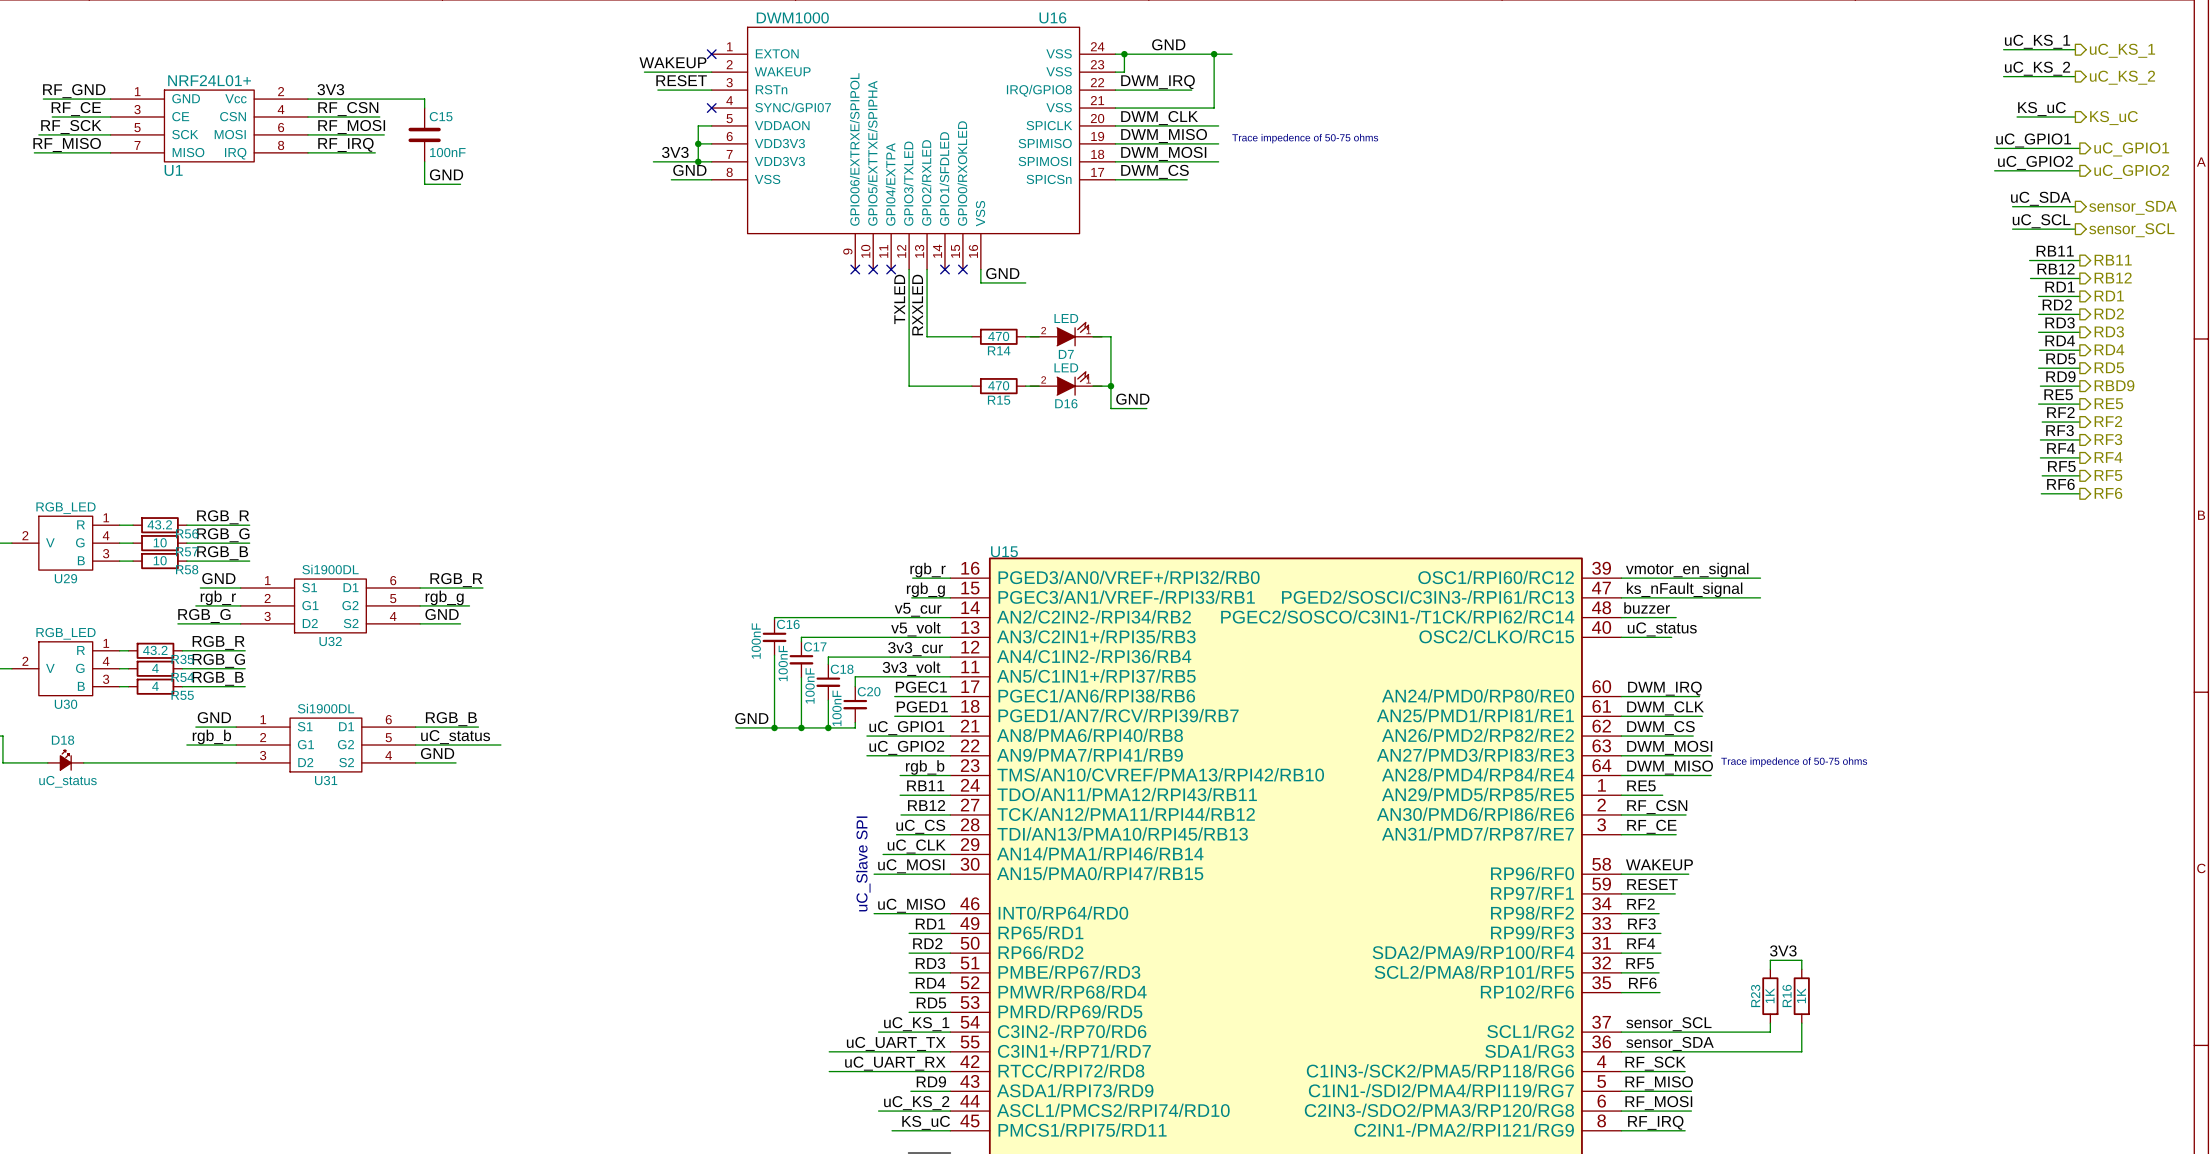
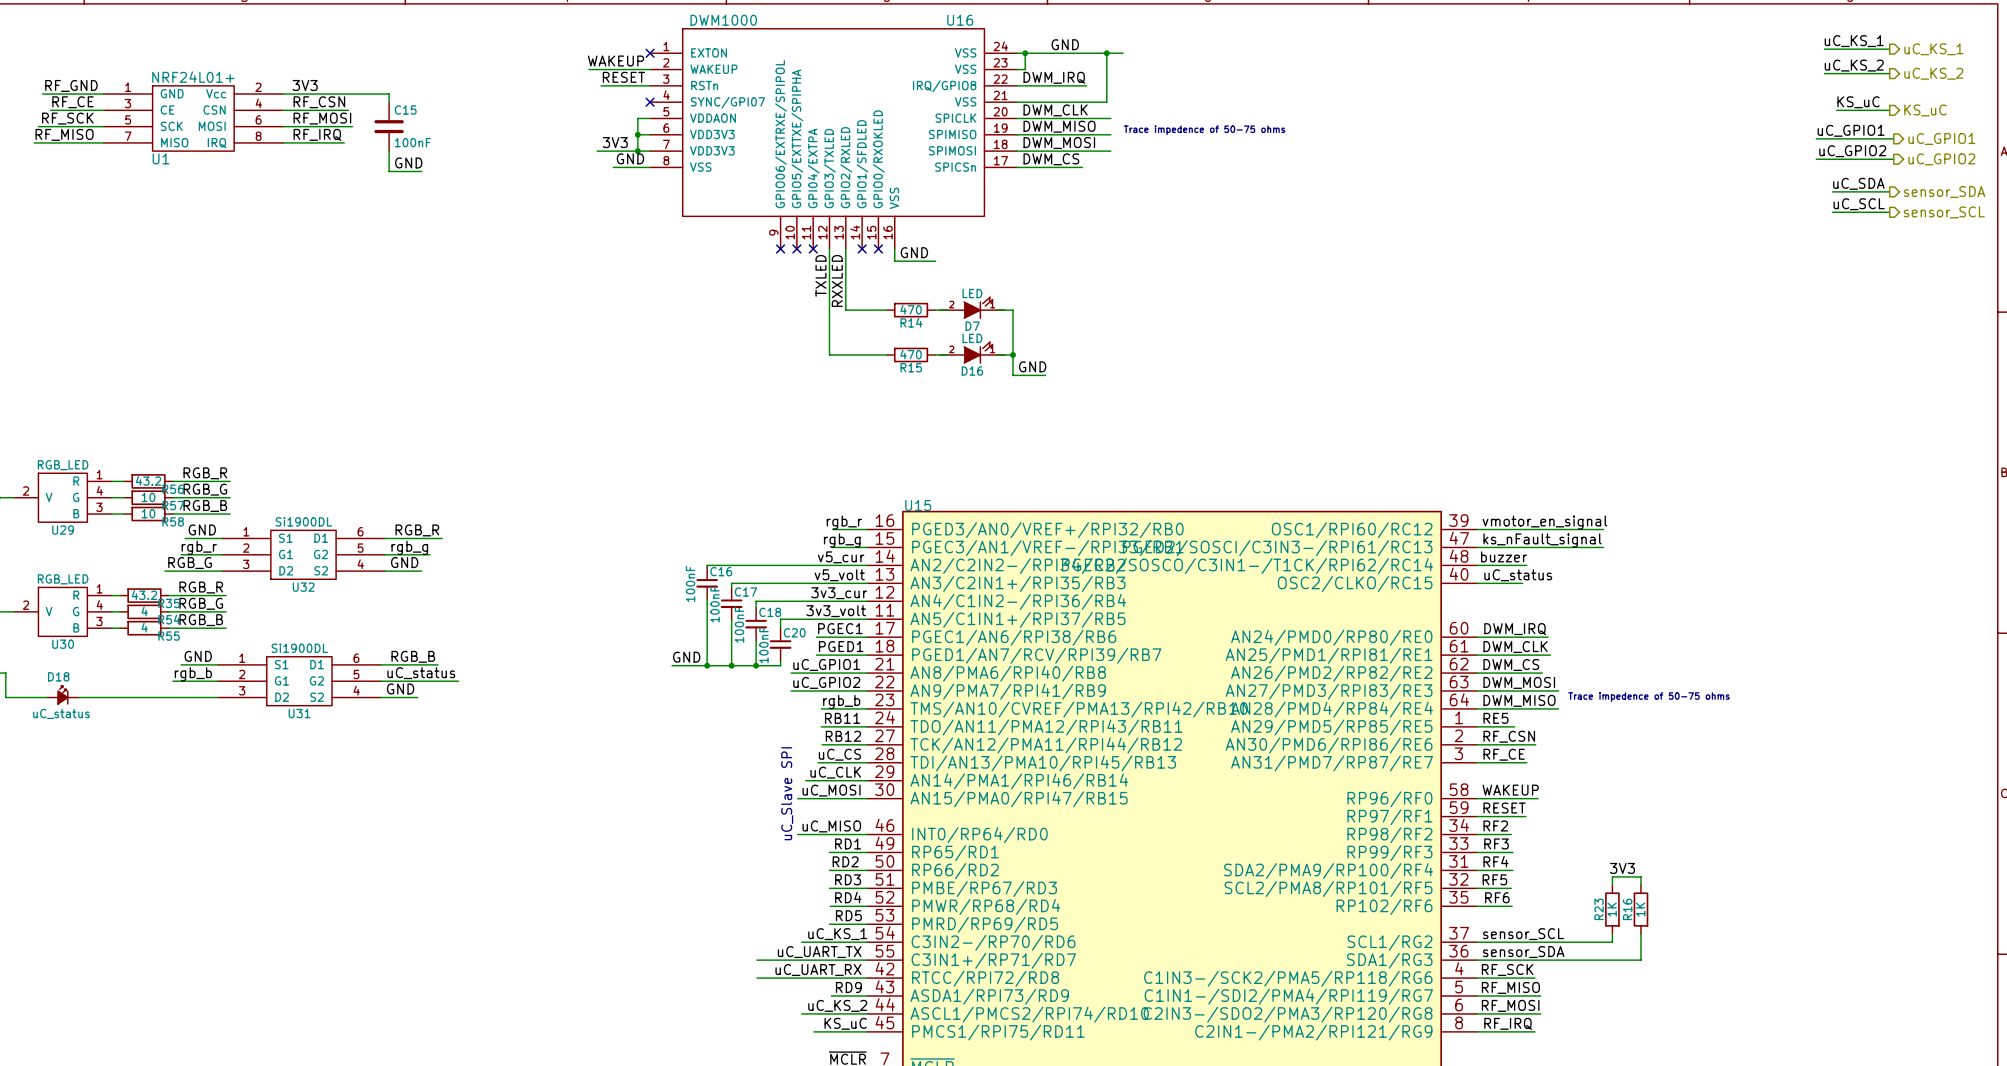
label: RB11 (2055, 251) -> none
wire: (2029, 260) (2079, 260) -> none
hierarchical label: RB11 (2113, 260) -> none
label: RB12 (2056, 269) -> none
wire: (2030, 278) (2079, 278) -> none
hierarchical label: RB12 (2113, 278) -> none
label: RD1 (2060, 287) -> none
wire: (2038, 296) (2079, 296) -> none
hierarchical label: RD1 (2109, 296) -> none
label: RD2 (2057, 304) -> none
hierarchical label: RD2 (2109, 313) -> none
wire: (2038, 314) (2079, 314) -> none
label: RD3 (2060, 322) -> none
hierarchical label: RD3 (2109, 331) -> none
wire: (2038, 332) (2079, 332) -> none
label: RD4 (2060, 340) -> none
hierarchical label: RD4 (2109, 349) -> none
wire: (2039, 350) (2079, 350) -> none
label: RD5 (2060, 358) -> none
hierarchical label: RD5 (2109, 367) -> none
wire: (2038, 368) (2079, 368) -> none
label: RD9 (2060, 376) -> none
hierarchical label: RBD9 (2114, 385) -> none
wire: (2040, 386) (2079, 386) -> none
label: RE5 (2058, 394) -> none
hierarchical label: RE5 (2108, 403) -> none
wire: (2038, 404) (2079, 404) -> none
label: RF2 (2060, 412) -> none
hierarchical label: RF2 (2108, 421) -> none
wire: (2042, 422) (2079, 422) -> none
label: RF3 (2060, 430) -> none
wire: (2040, 439) (2079, 439) -> none
hierarchical label: RF3 (2108, 439) -> none
label: RF4 (2061, 448) -> none
wire: (2040, 457) (2079, 457) -> none
hierarchical label: RF4 (2108, 457) -> none
label: RF5 (2061, 466) -> none
wire: (2042, 475) (2079, 475) -> none
hierarchical label: RF5 (2108, 475) -> none
label: RF6 (2060, 484) -> none
wire: (2041, 493) (2079, 493) -> none
hierarchical label: RF6 (2108, 493) -> none

